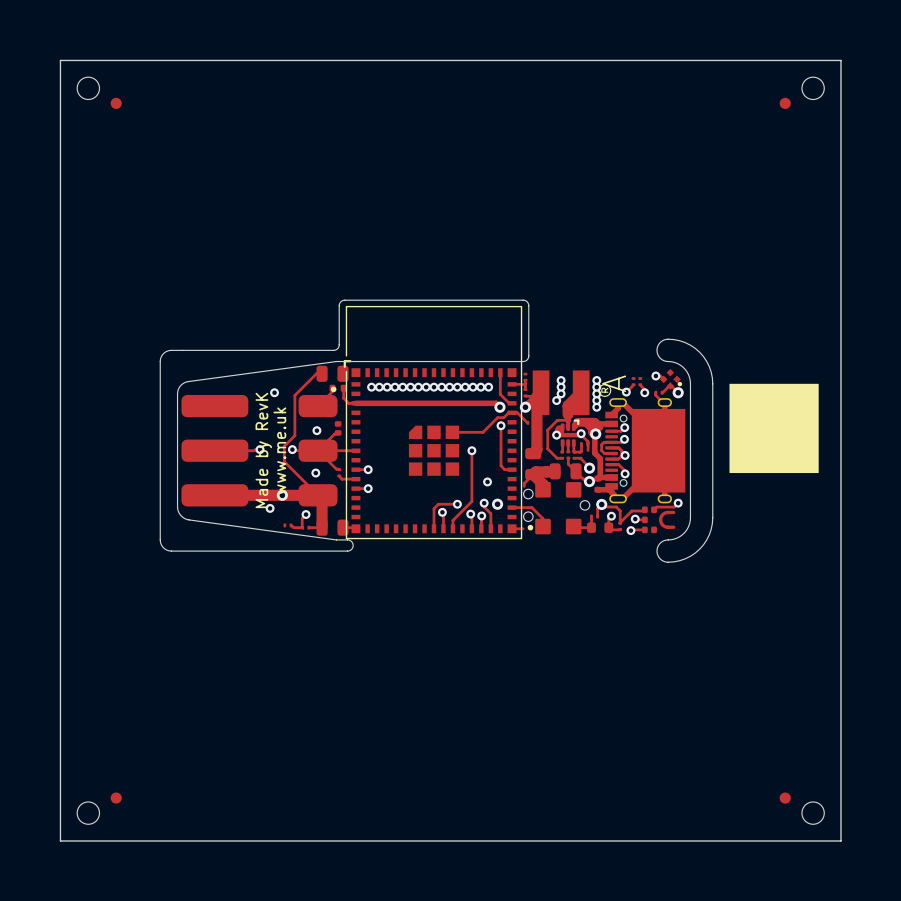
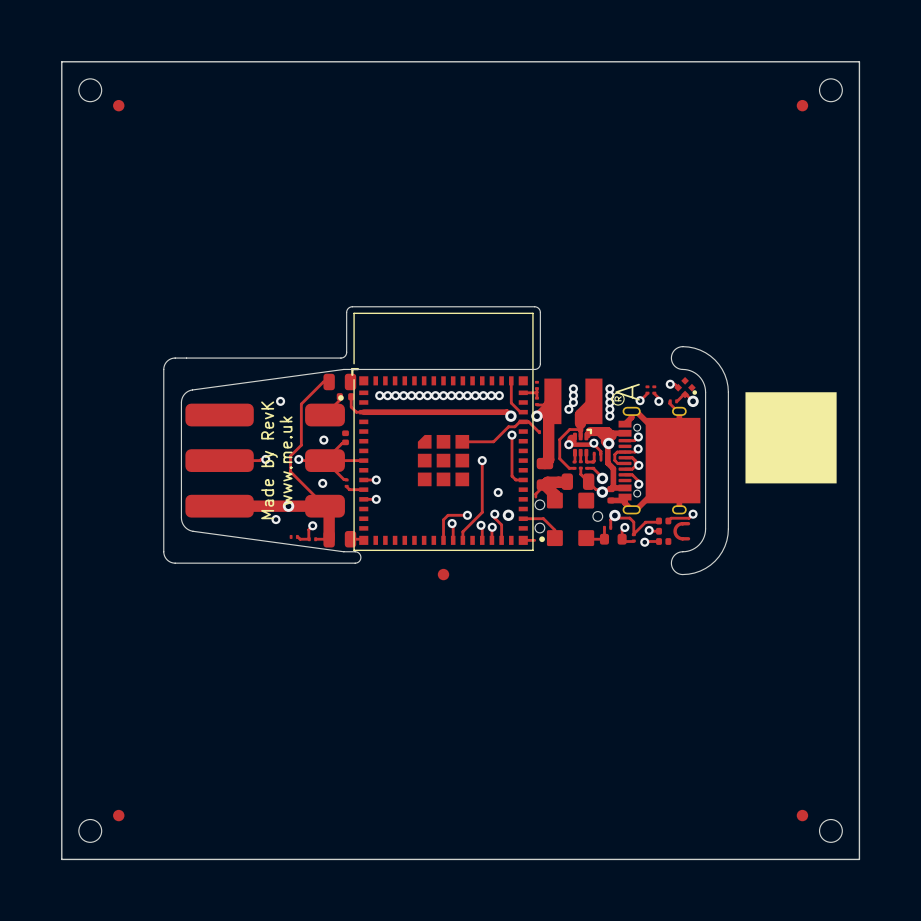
part: none -> (443, 574)

